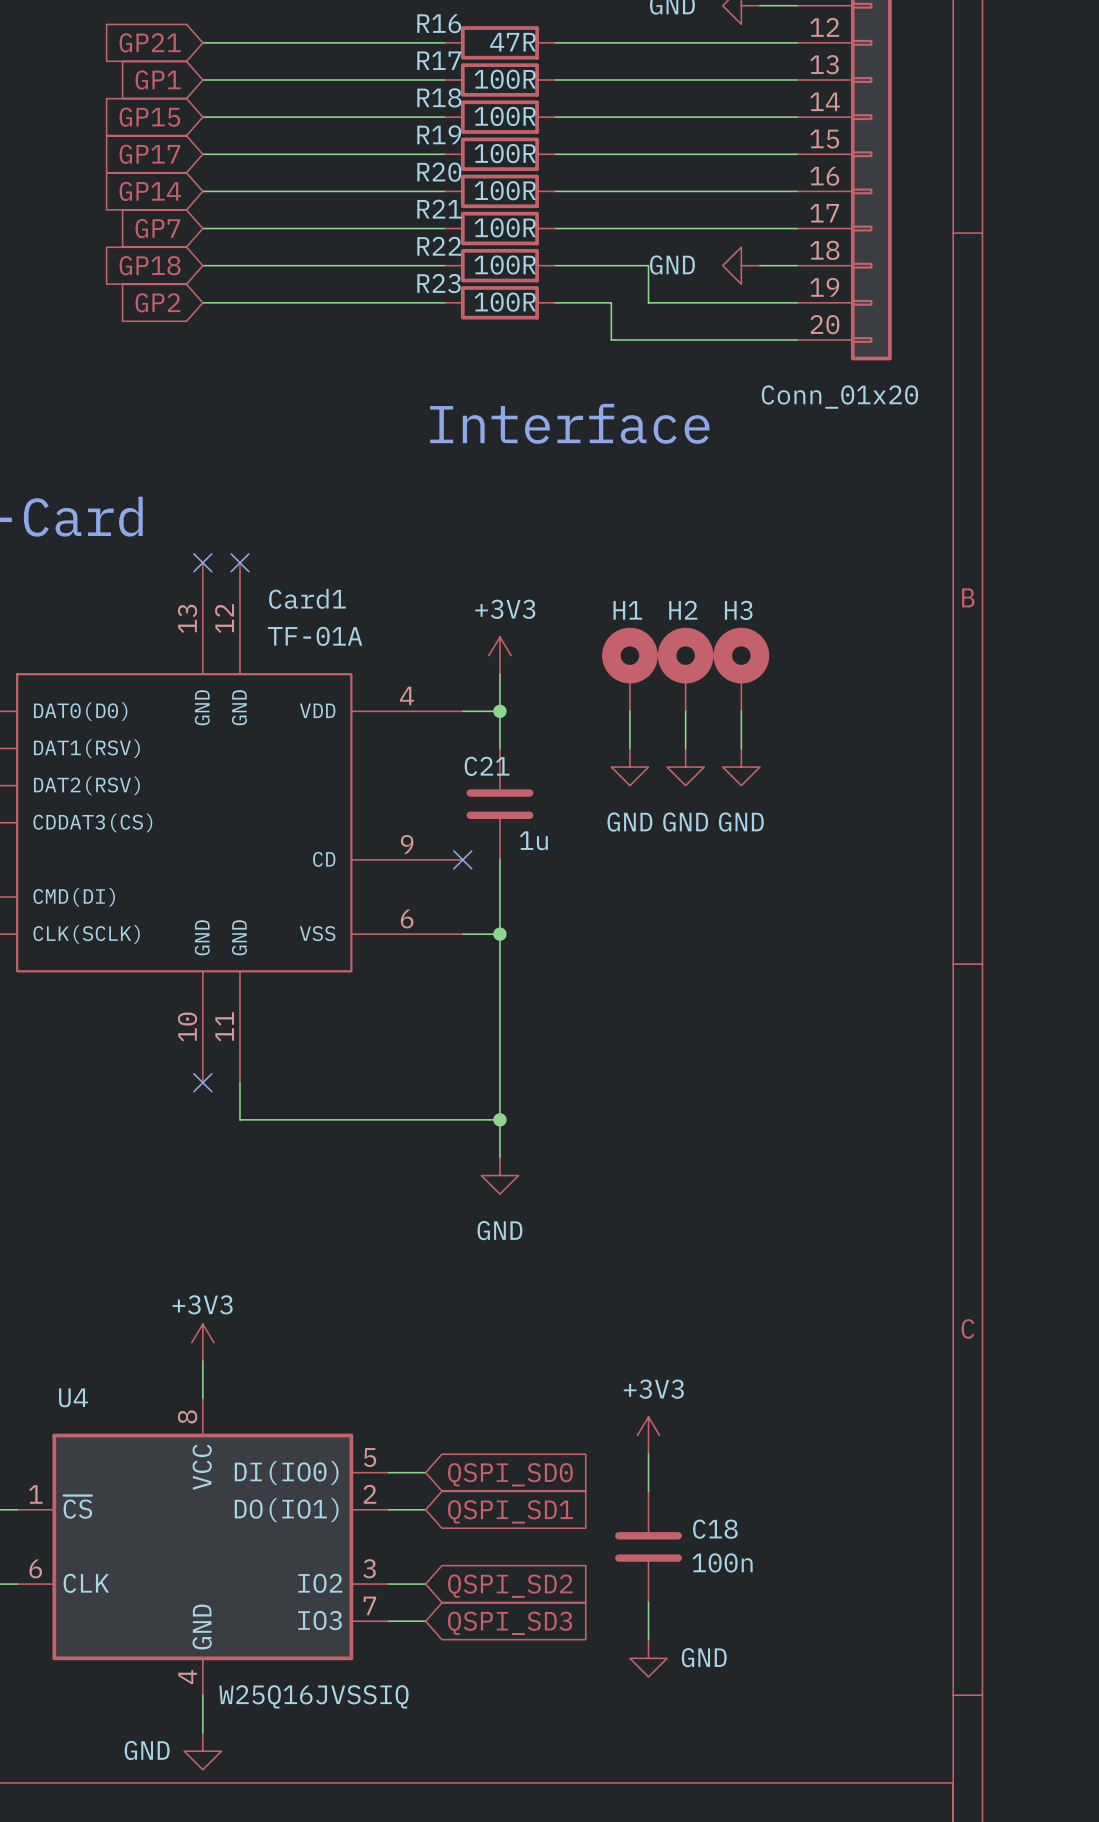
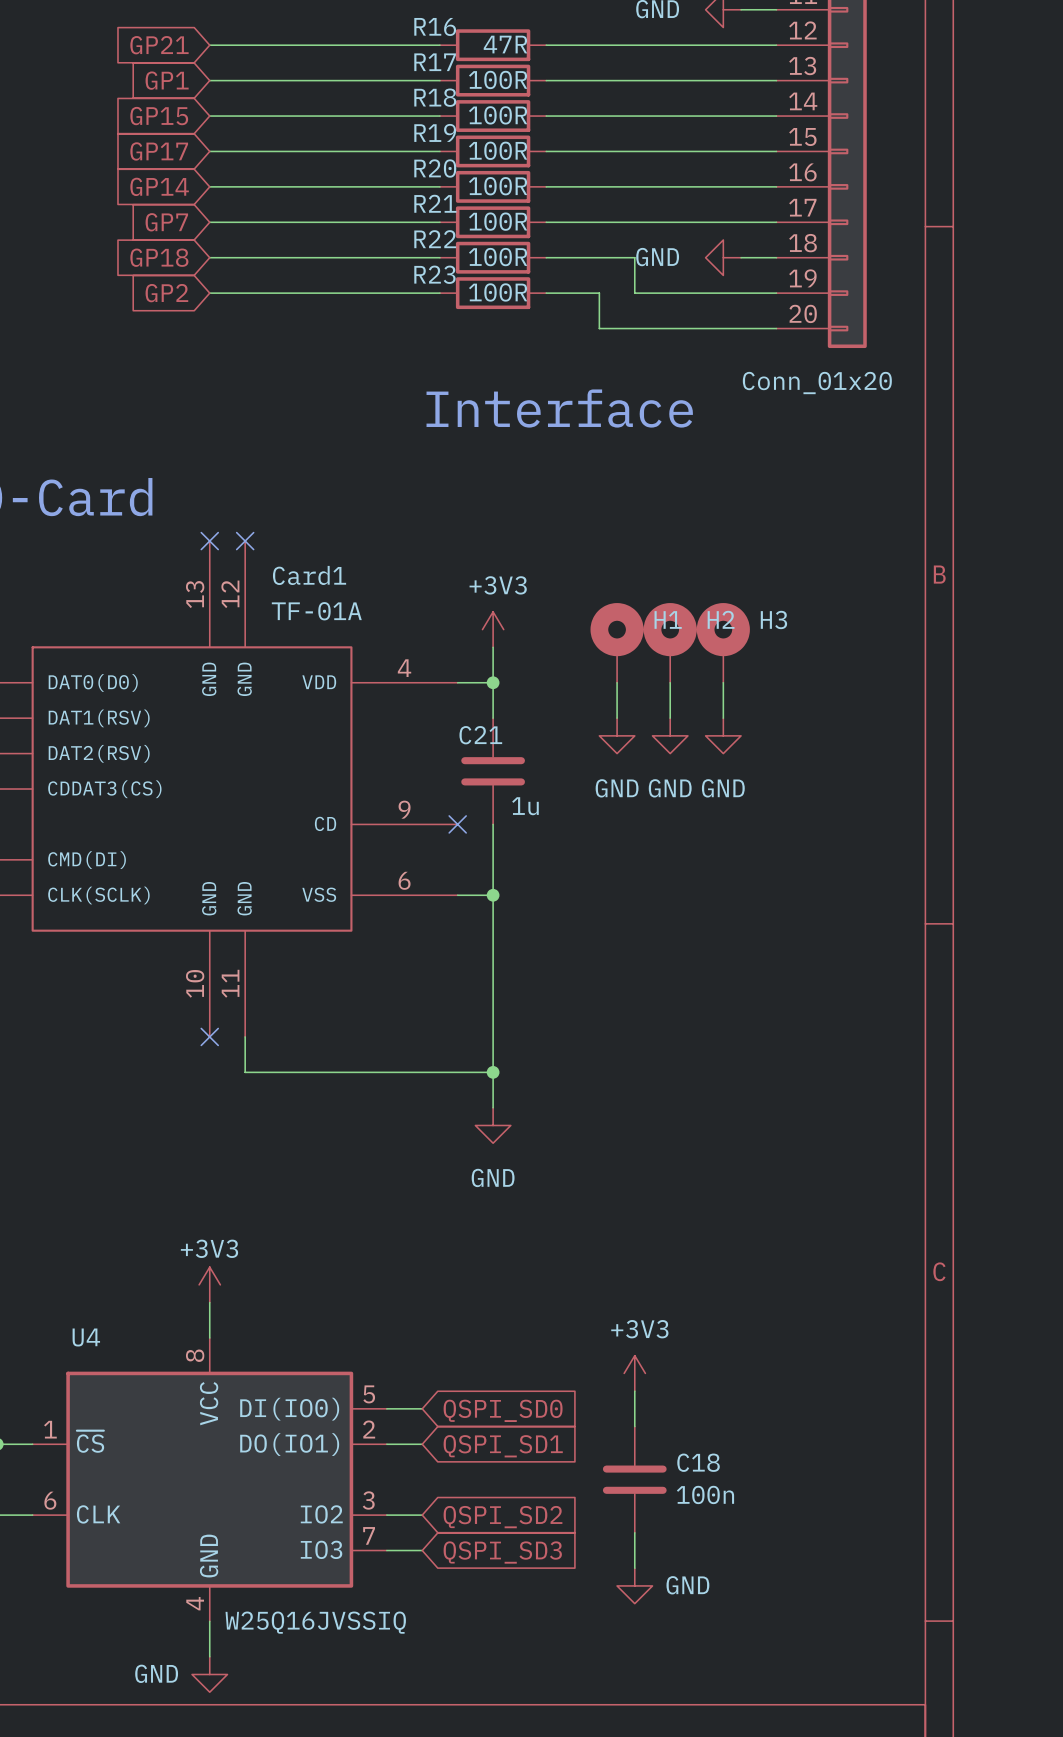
H1 name position: H1 (627, 610) -> H1 (668, 619)
H2 name position: H2 (683, 610) -> H2 (721, 619)
H3 name position: H3 (738, 610) -> H3 (773, 619)

